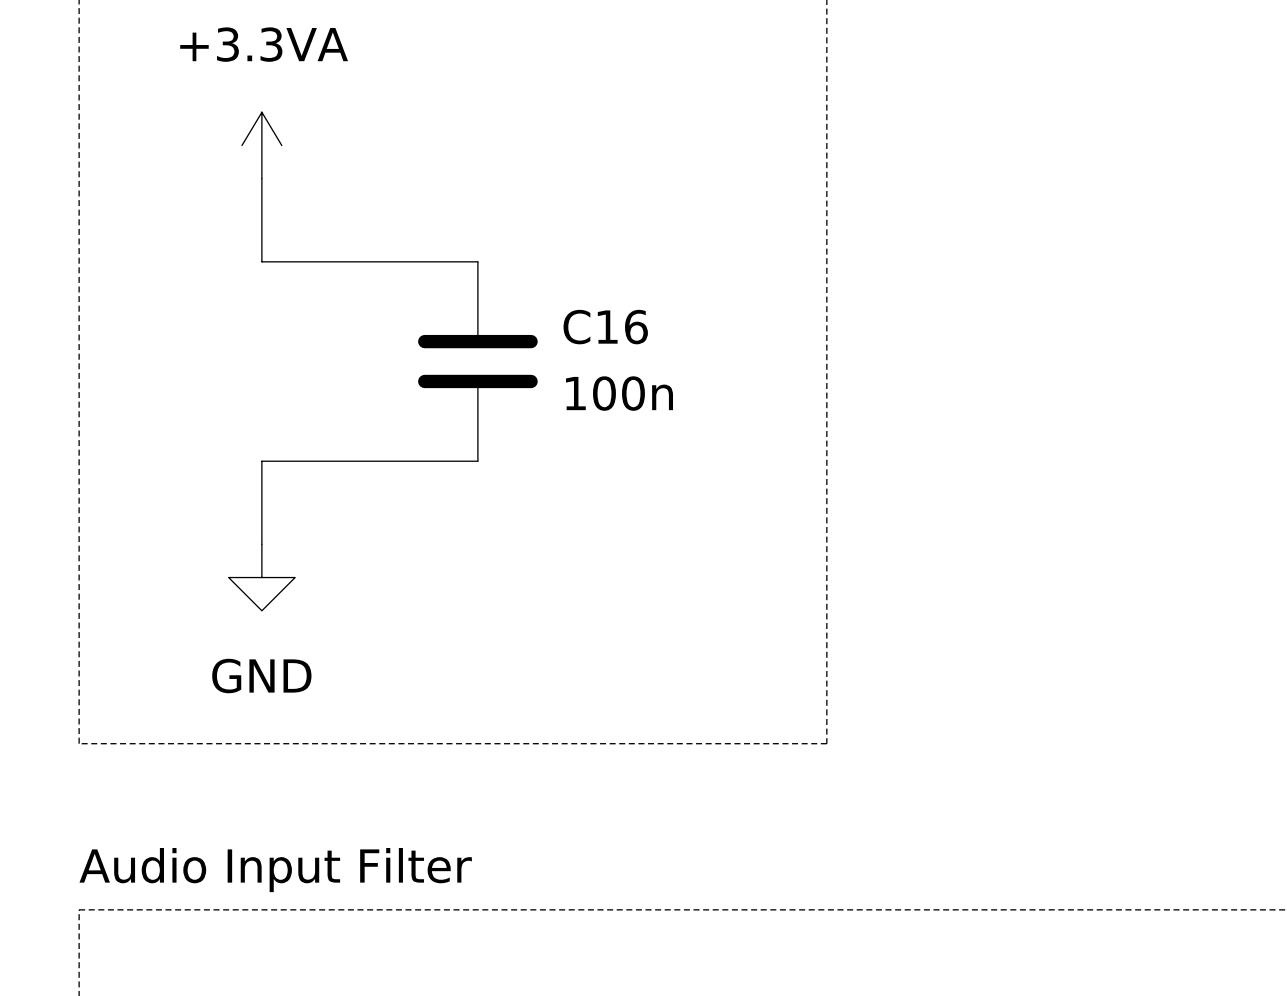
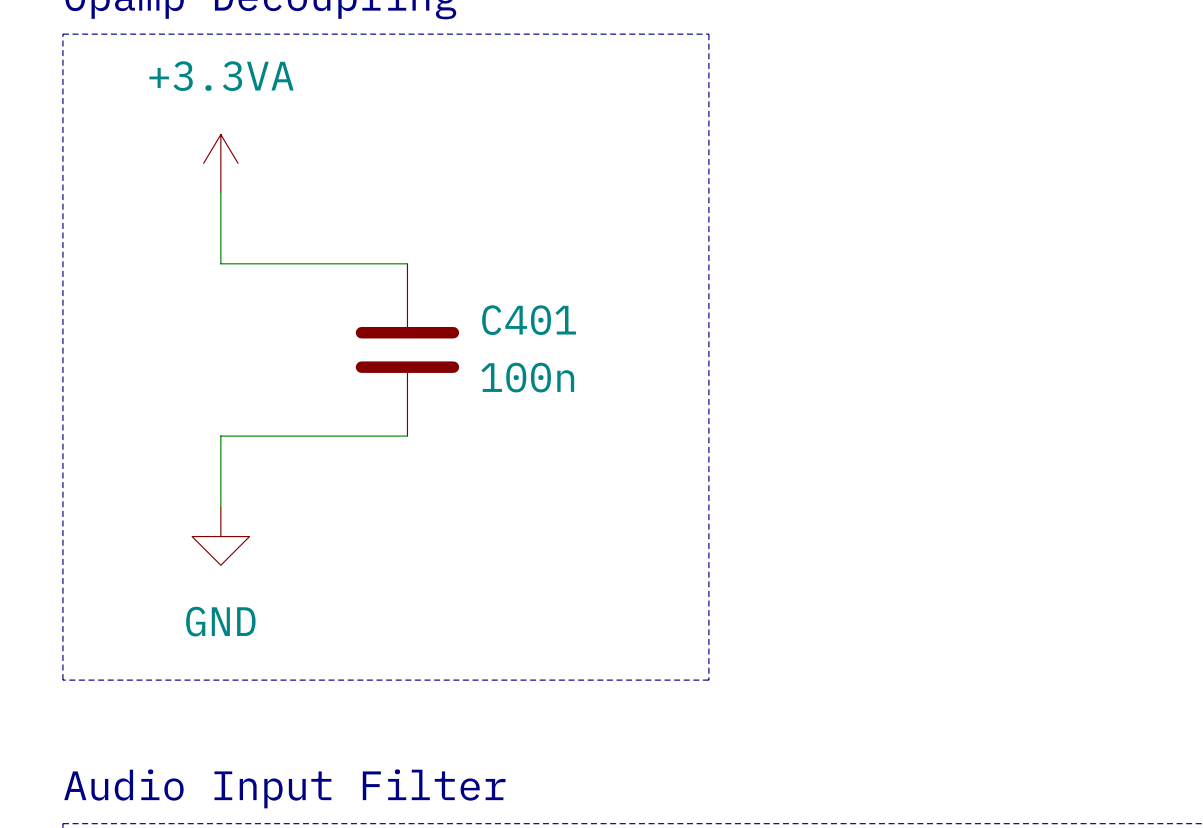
C16 name: C16 (605, 327) -> C401 (529, 320)

